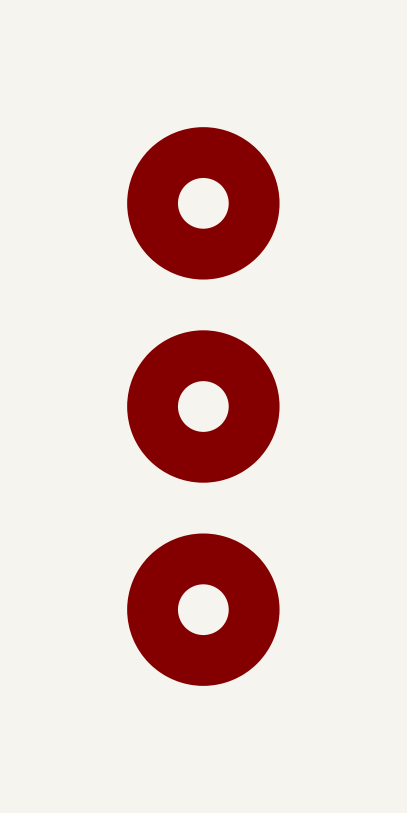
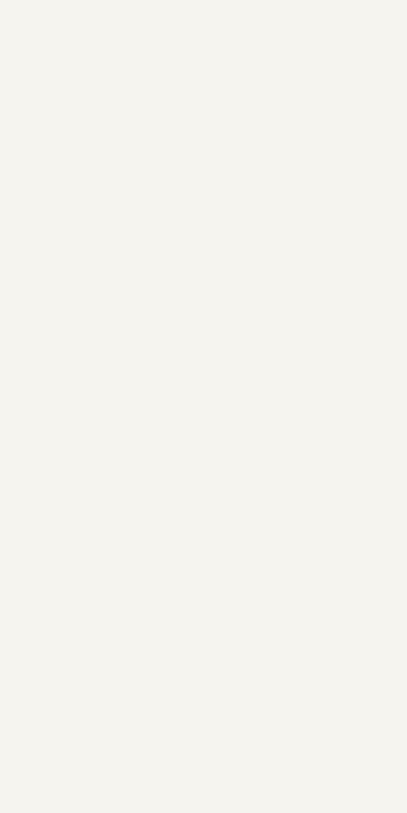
part: (203, 203) -> none
part: (203, 406) -> none
part: (203, 609) -> none

